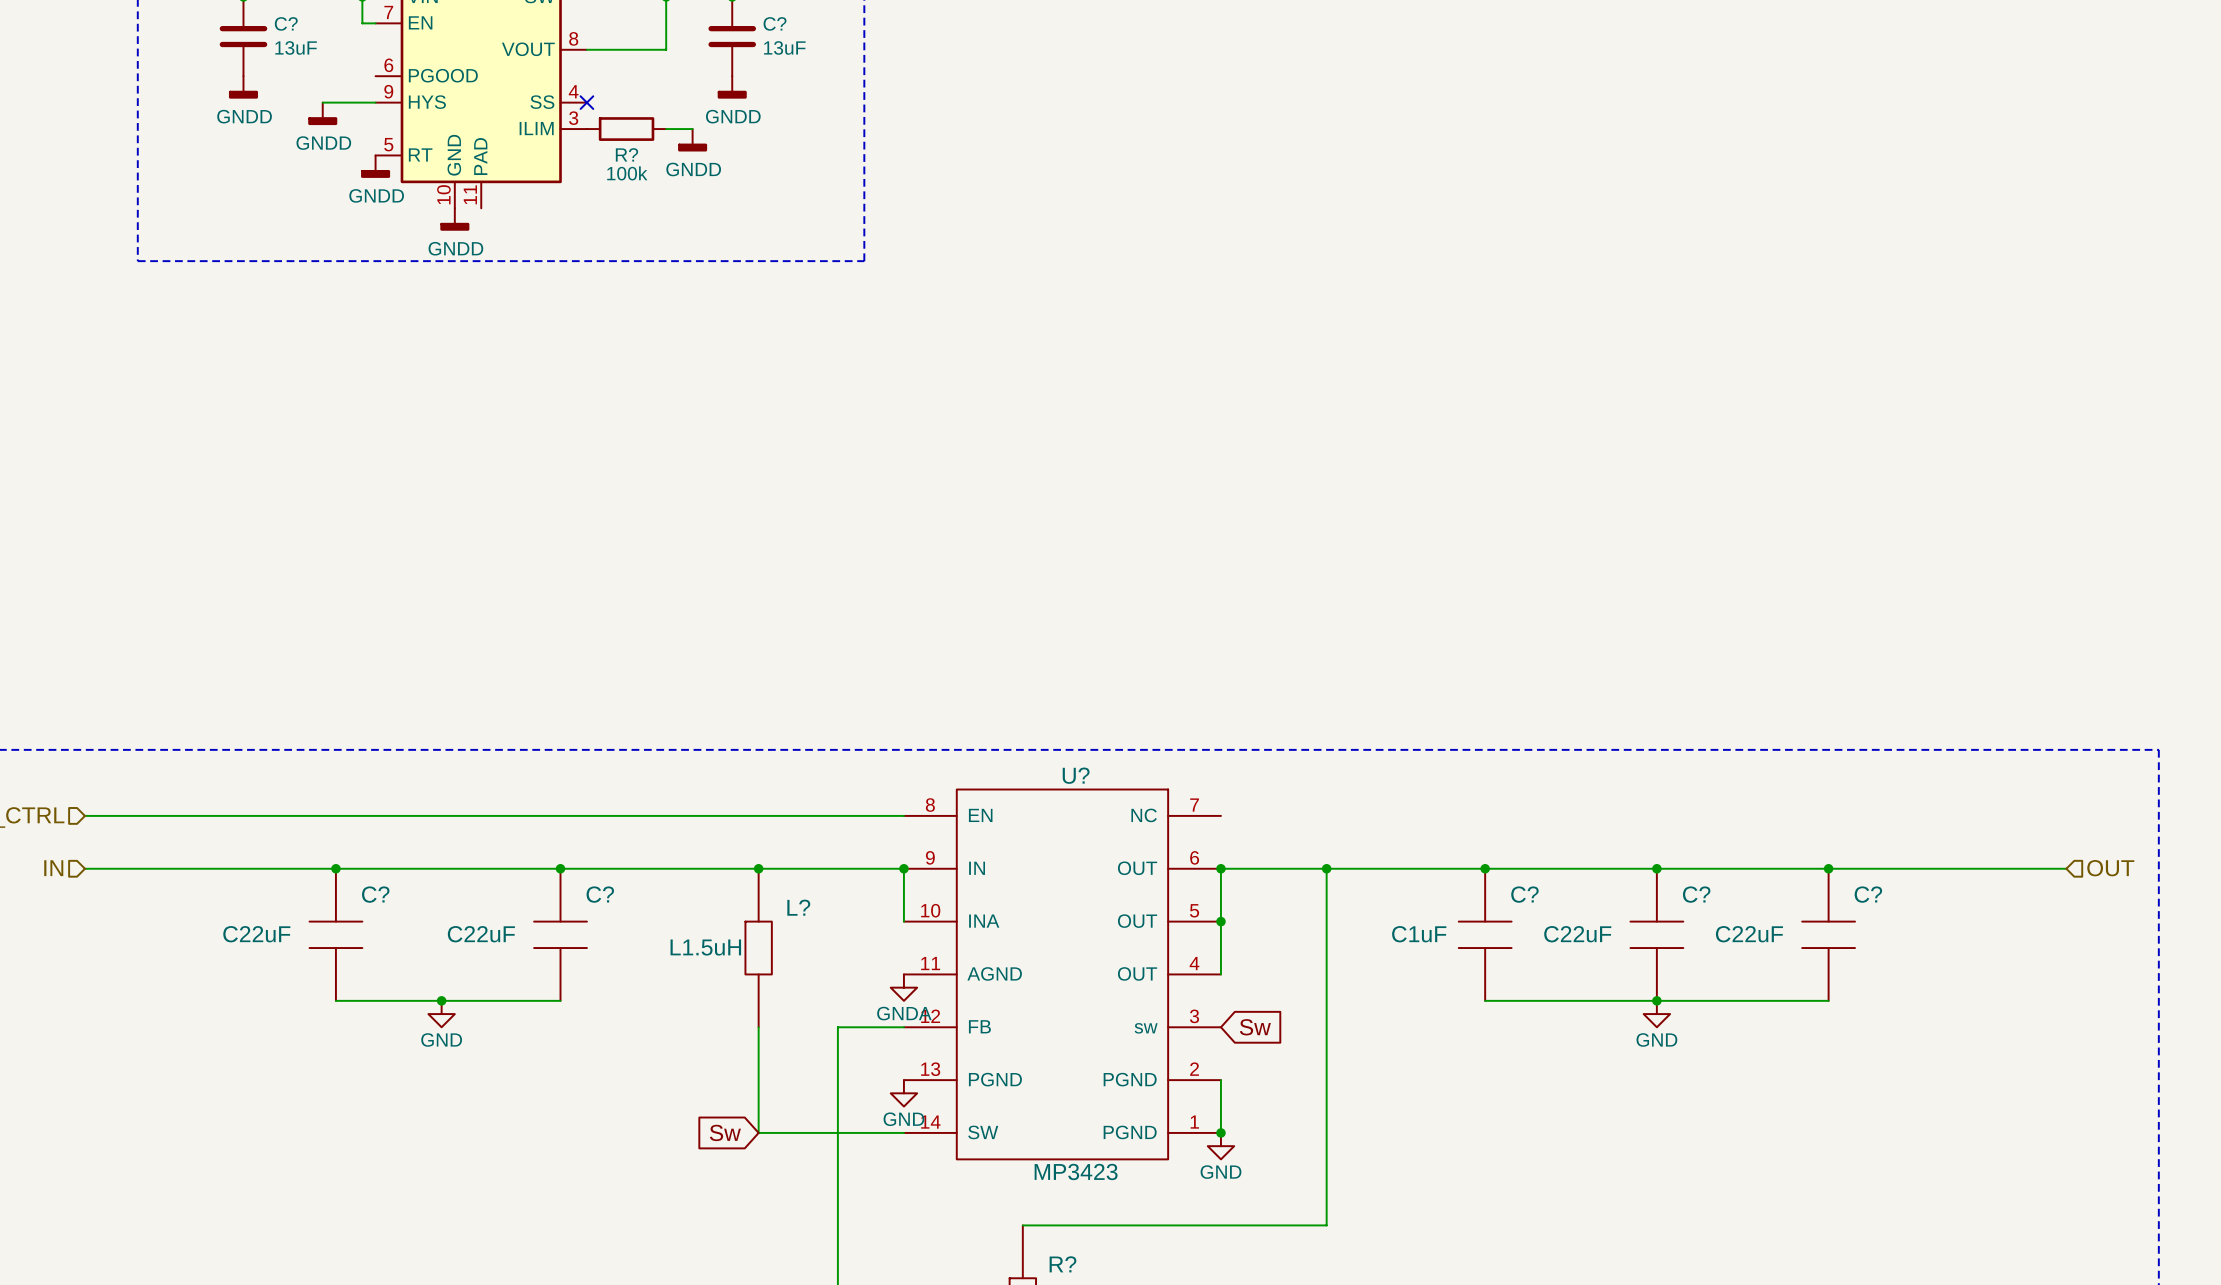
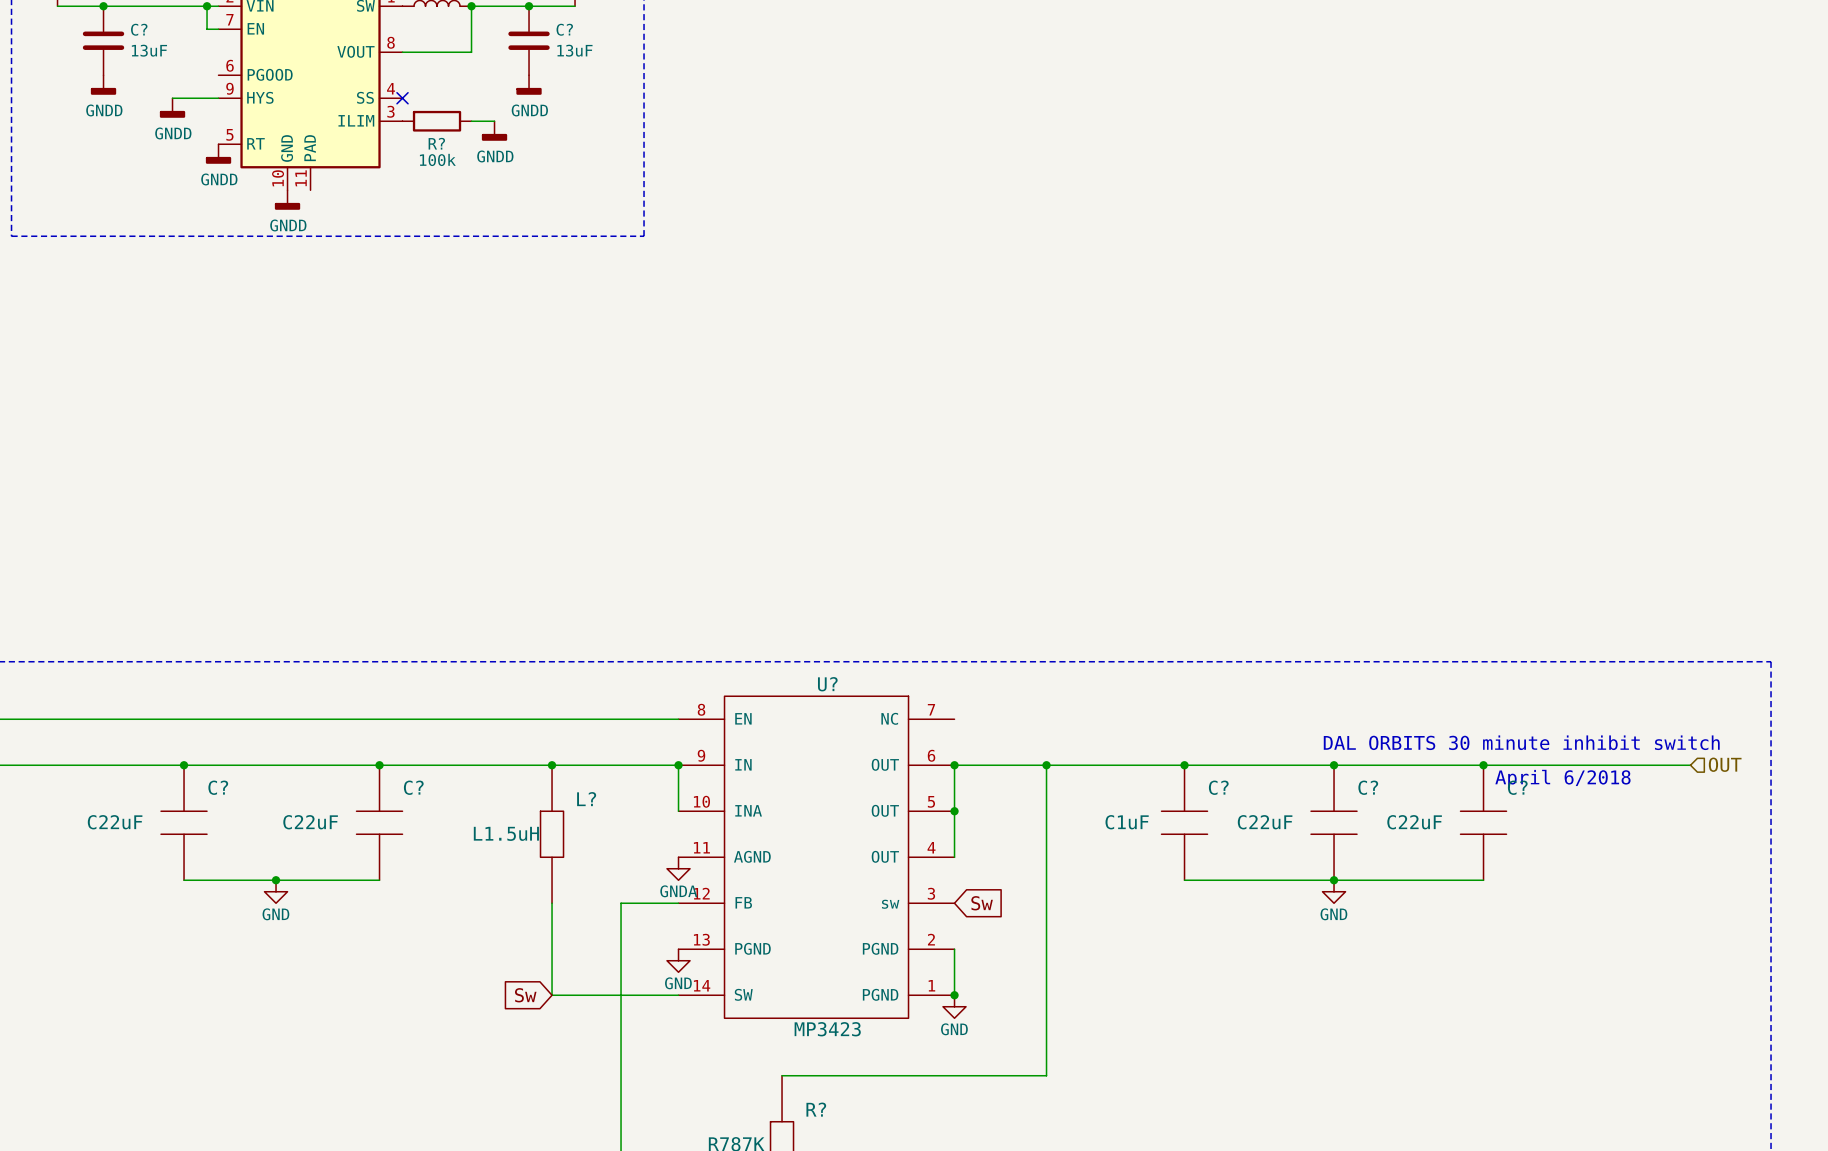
text: none -> DAL ORBITS 30 minute inhibit switch (1521, 742)
text: none -> April 6/2018 (1562, 779)

